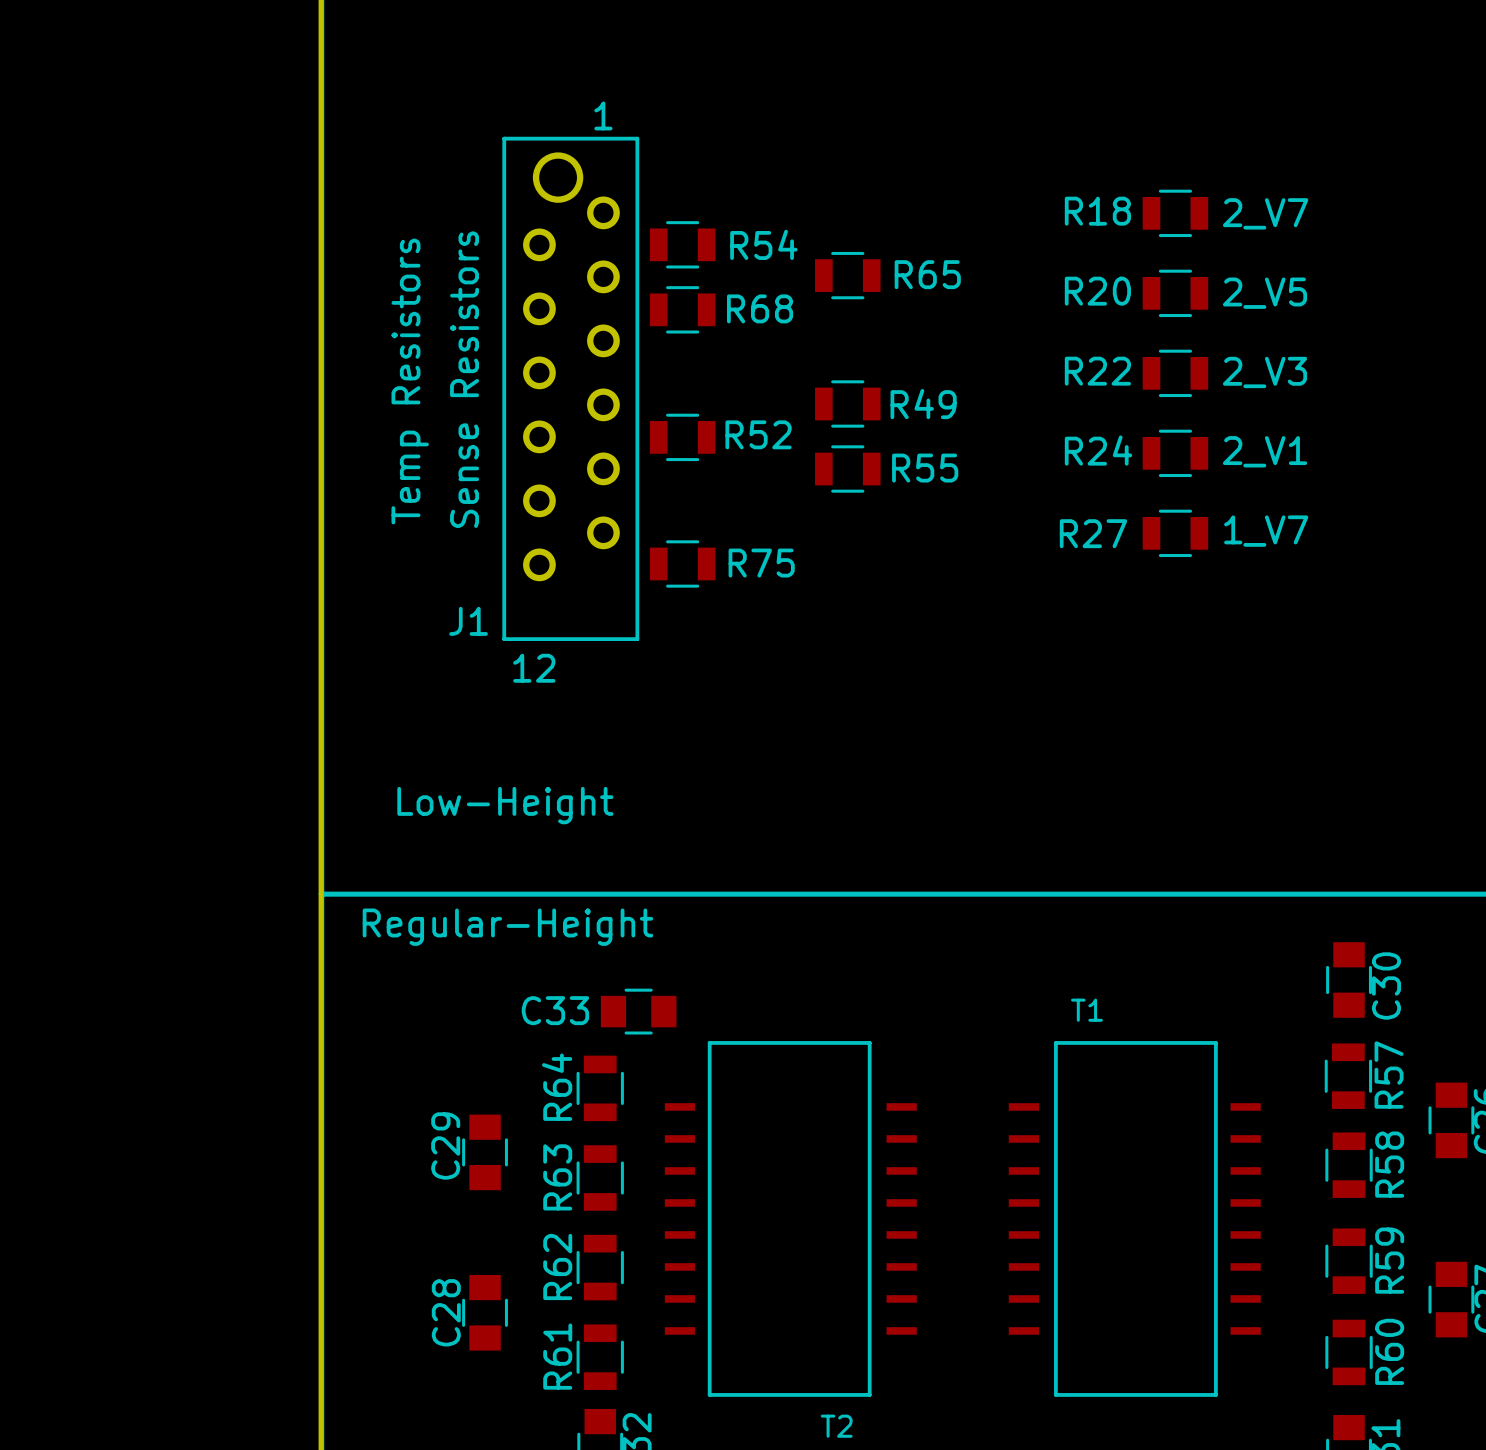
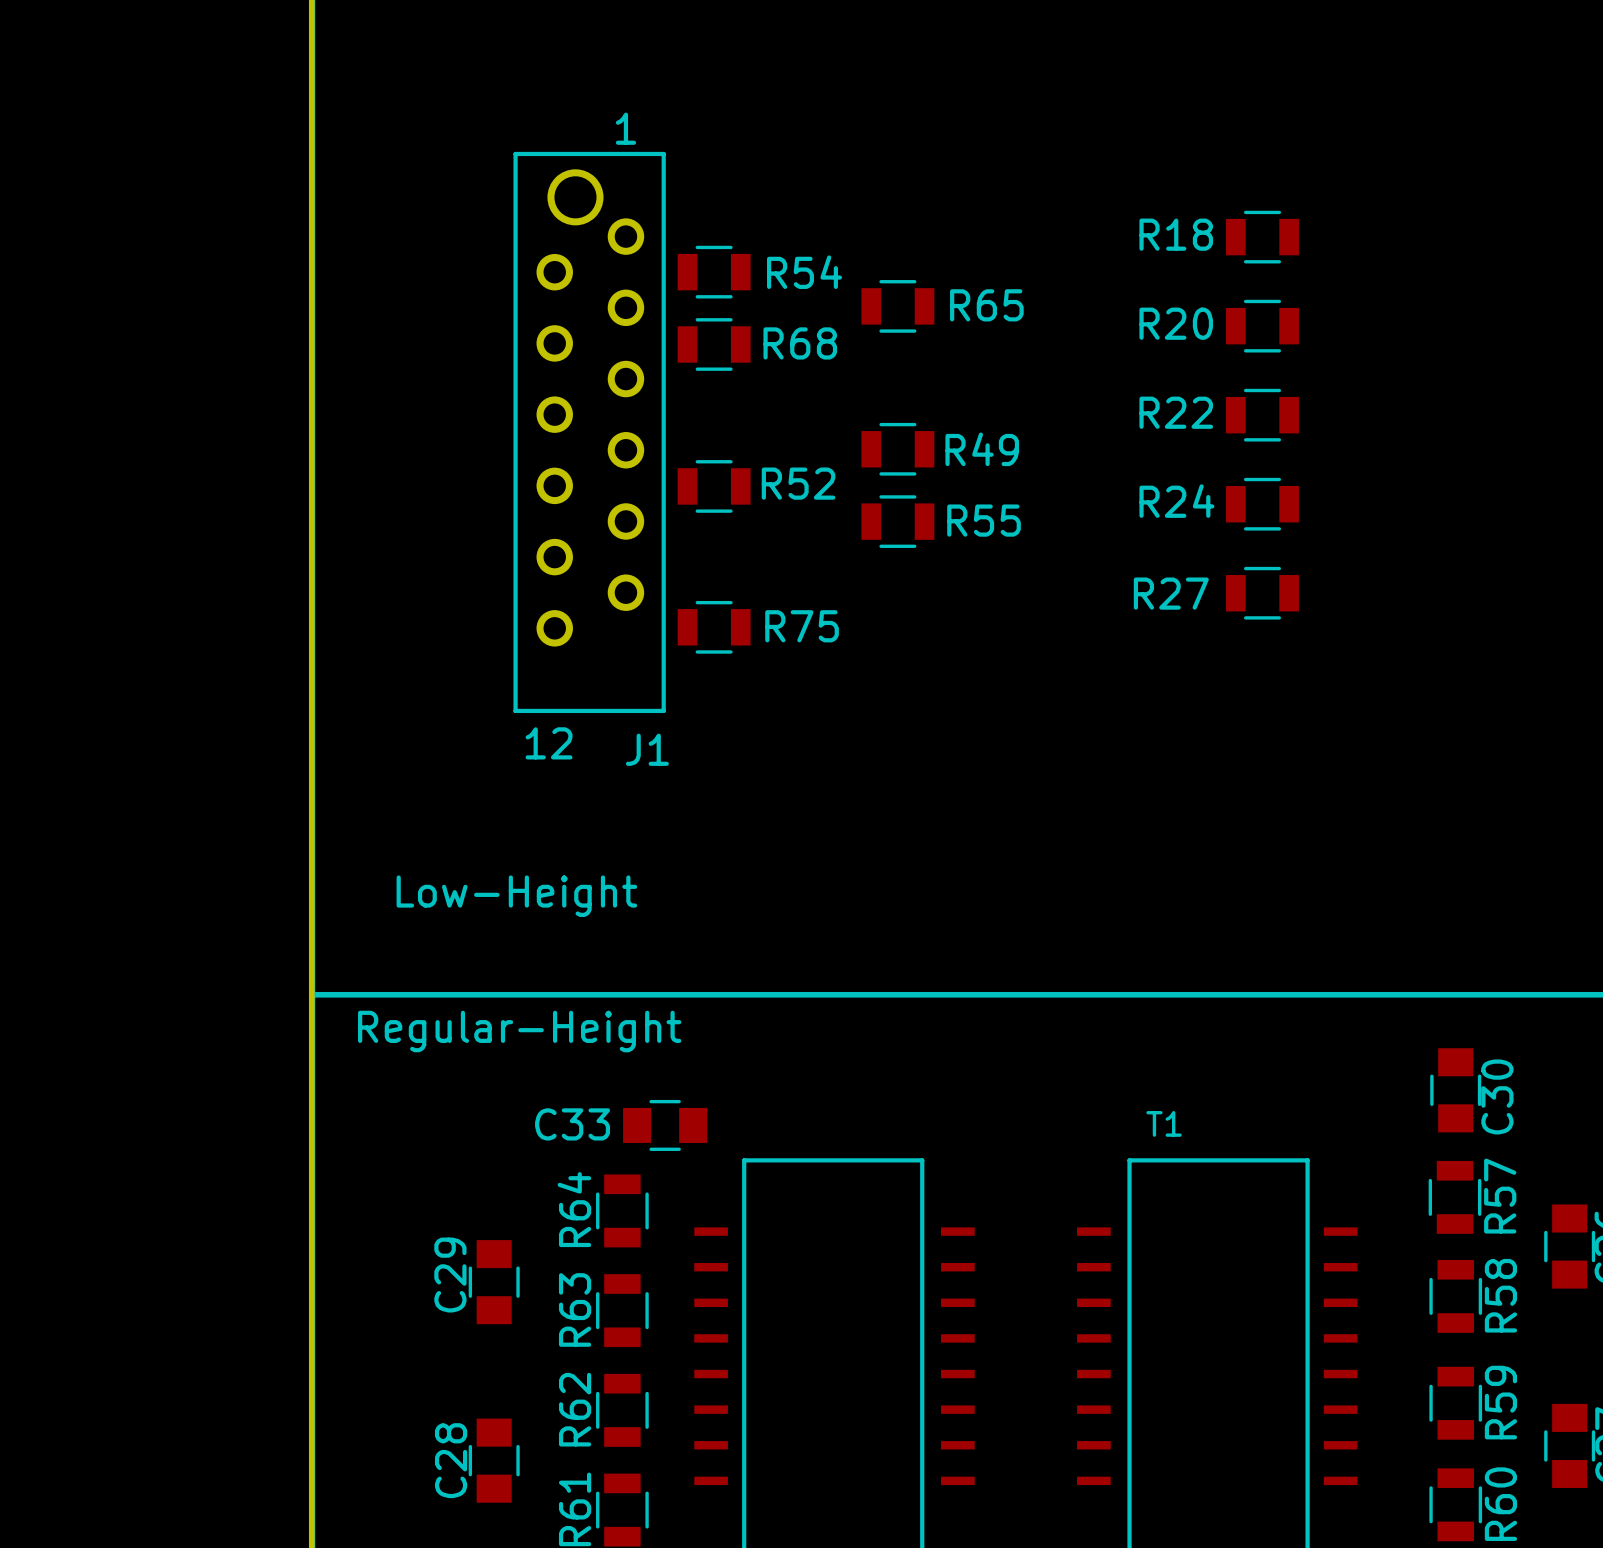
text: 2_V7 (1265, 213) -> none
text: 2_V5 (1265, 293) -> none
text: 2_V3 (1265, 372) -> none
text: Sense Resistors (464, 379) -> none
text: Temp Resistors (410, 381) -> none
text: 2_V1 (1265, 451) -> none
text: 1_V7 (1266, 531) -> none
J1 name position: J1 (468, 621) -> J1 (647, 749)

